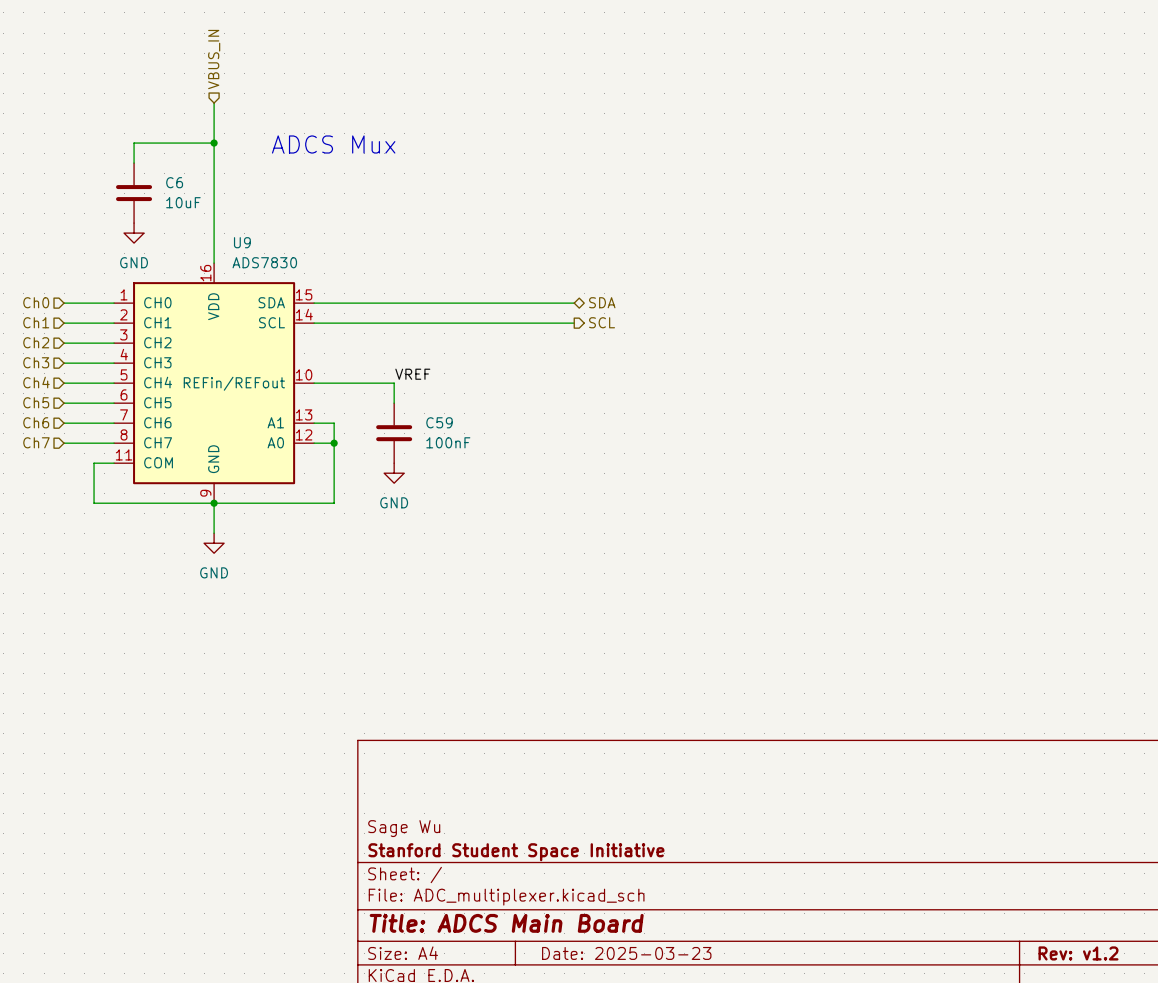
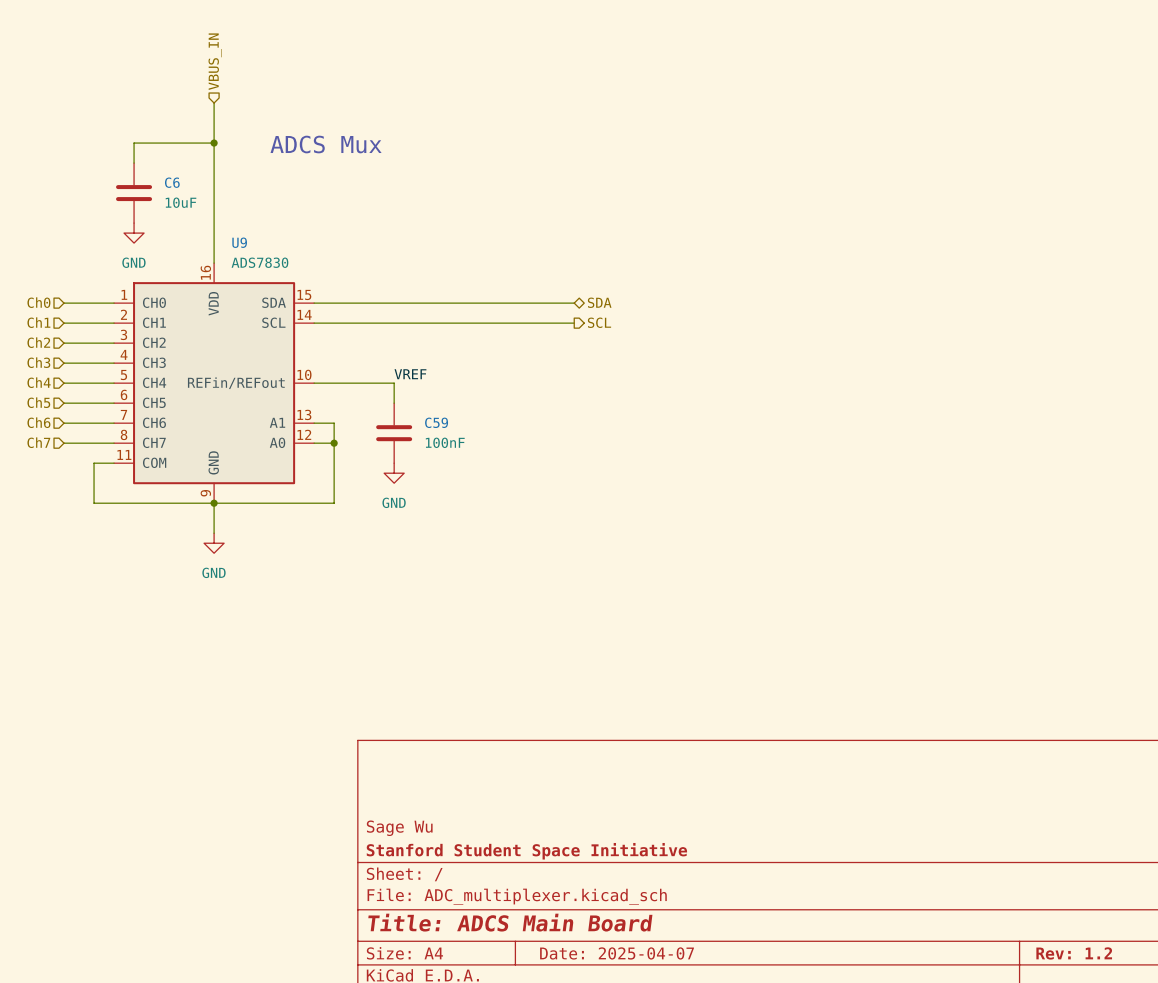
title block: Date: 2025-03-23 (626, 953) -> Date: 2025-04-07 (617, 953)
title block: Rev: v1.2 (1078, 953) -> Rev: 1.2 (1074, 953)

